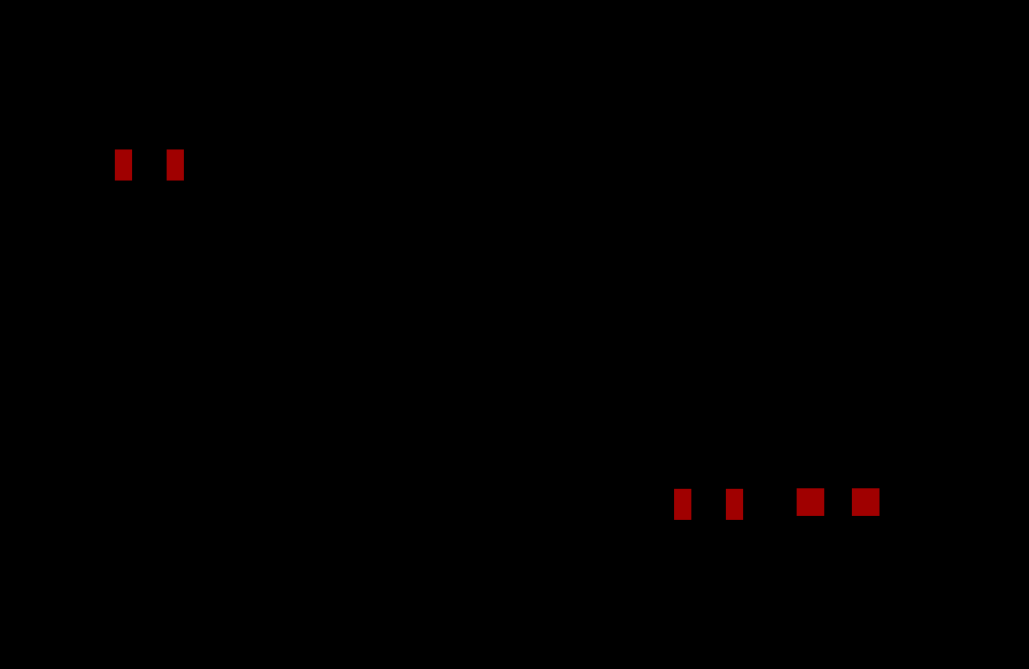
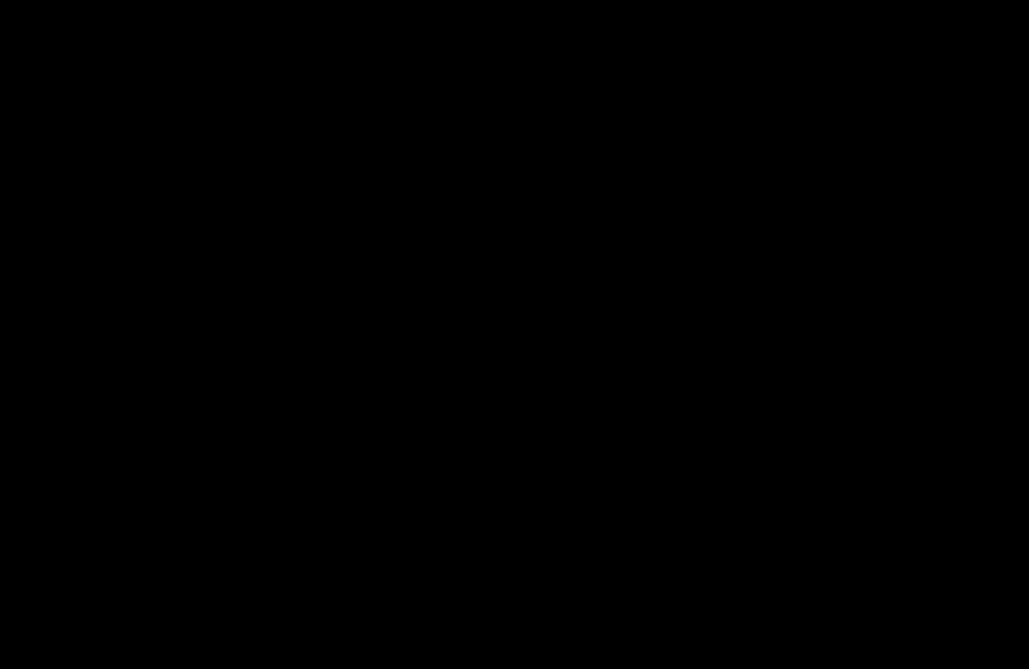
part: (149, 164) -> none
part: (838, 502) -> none
part: (708, 504) -> none

